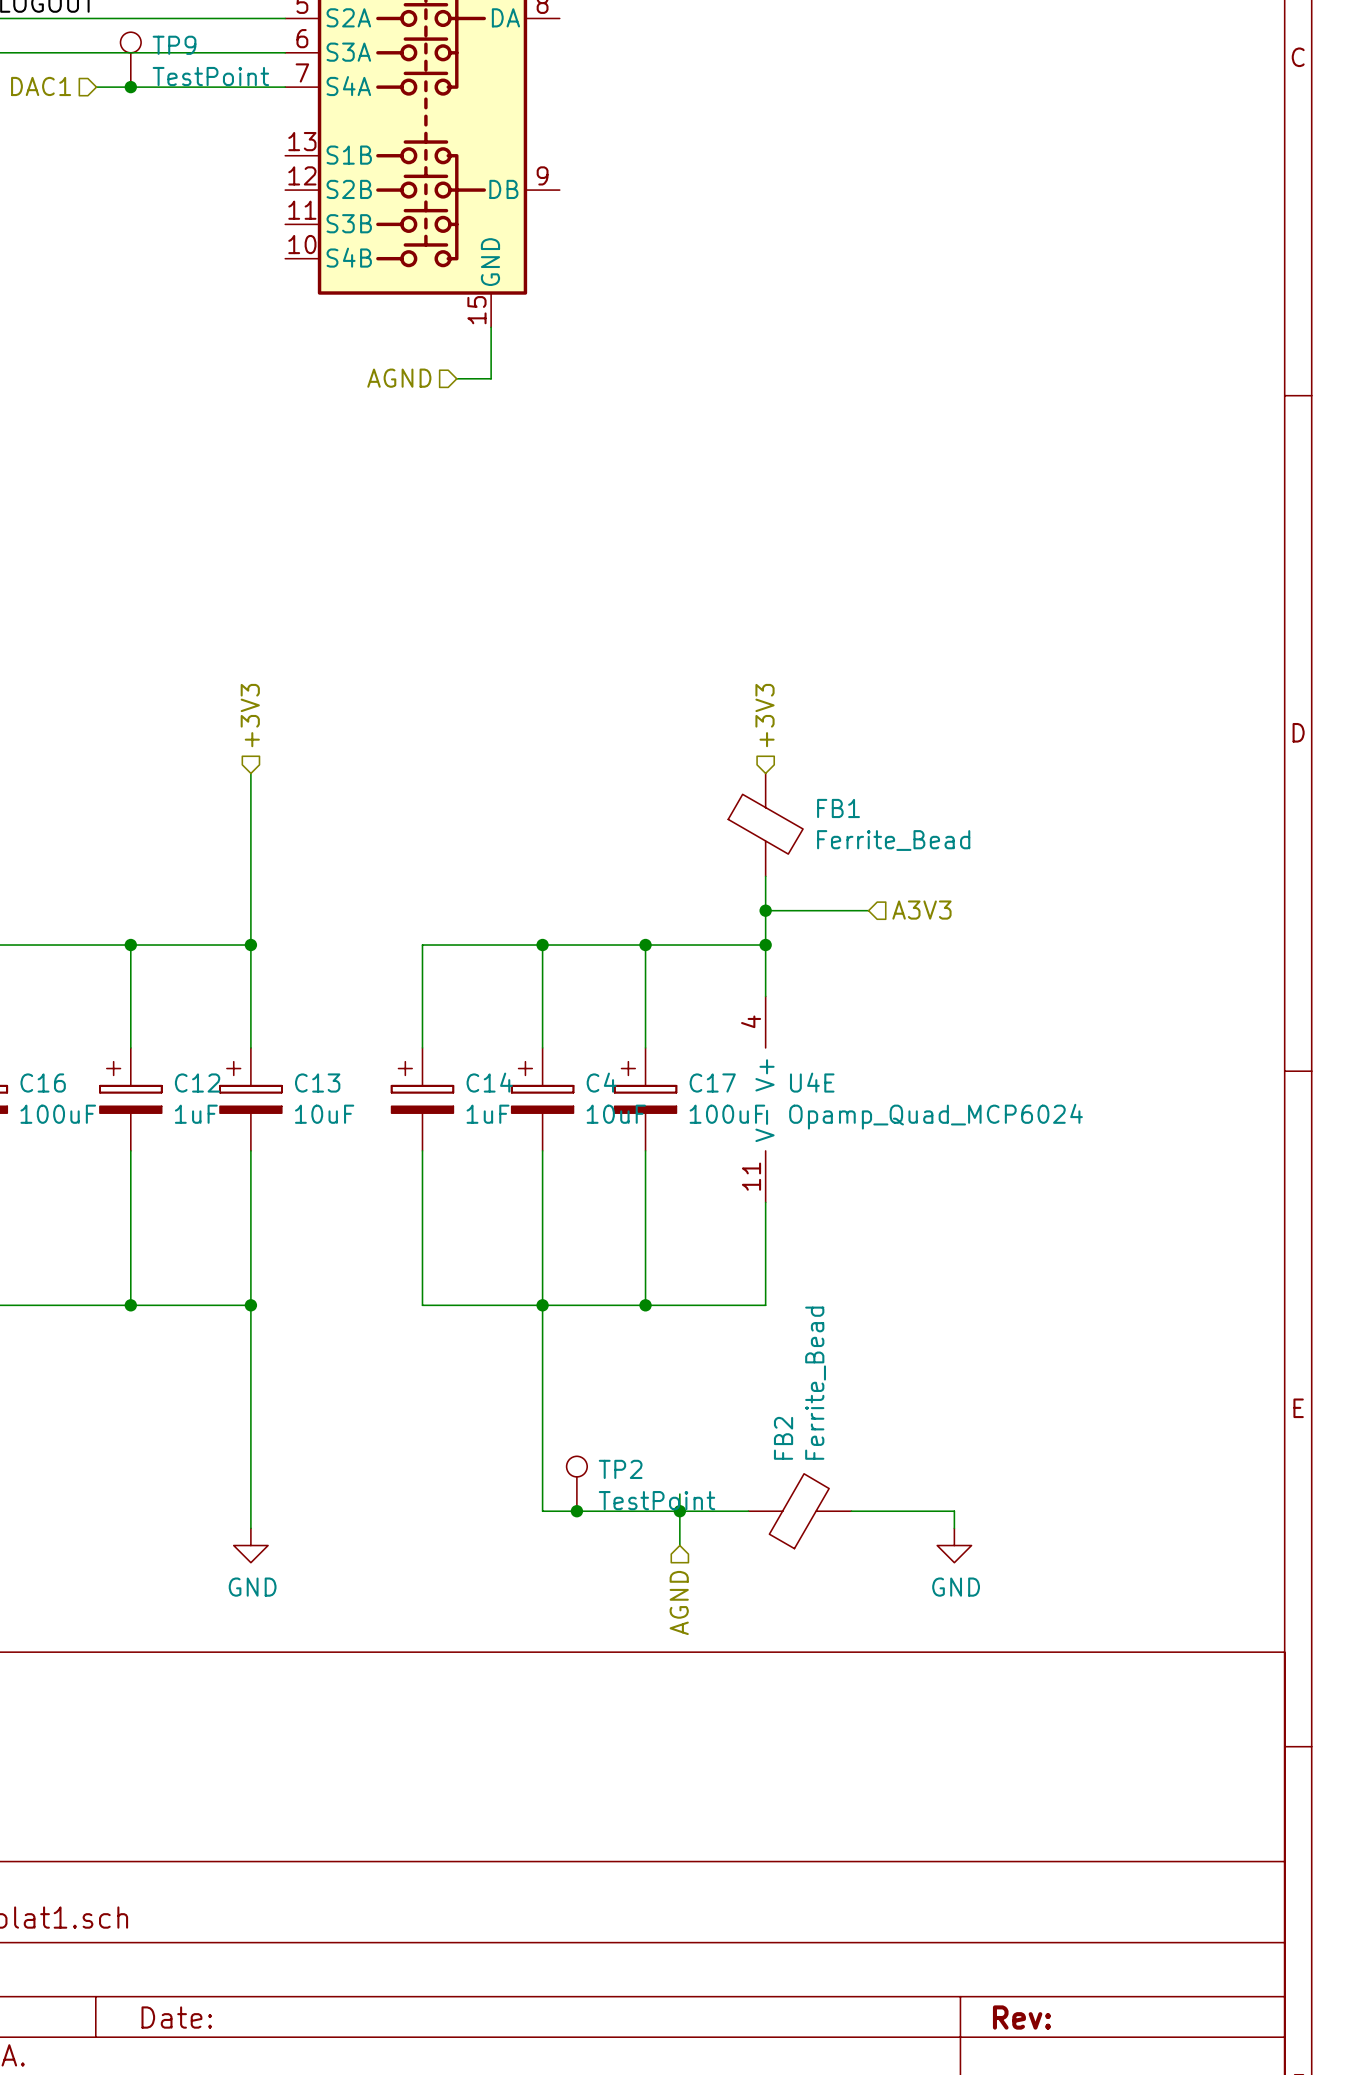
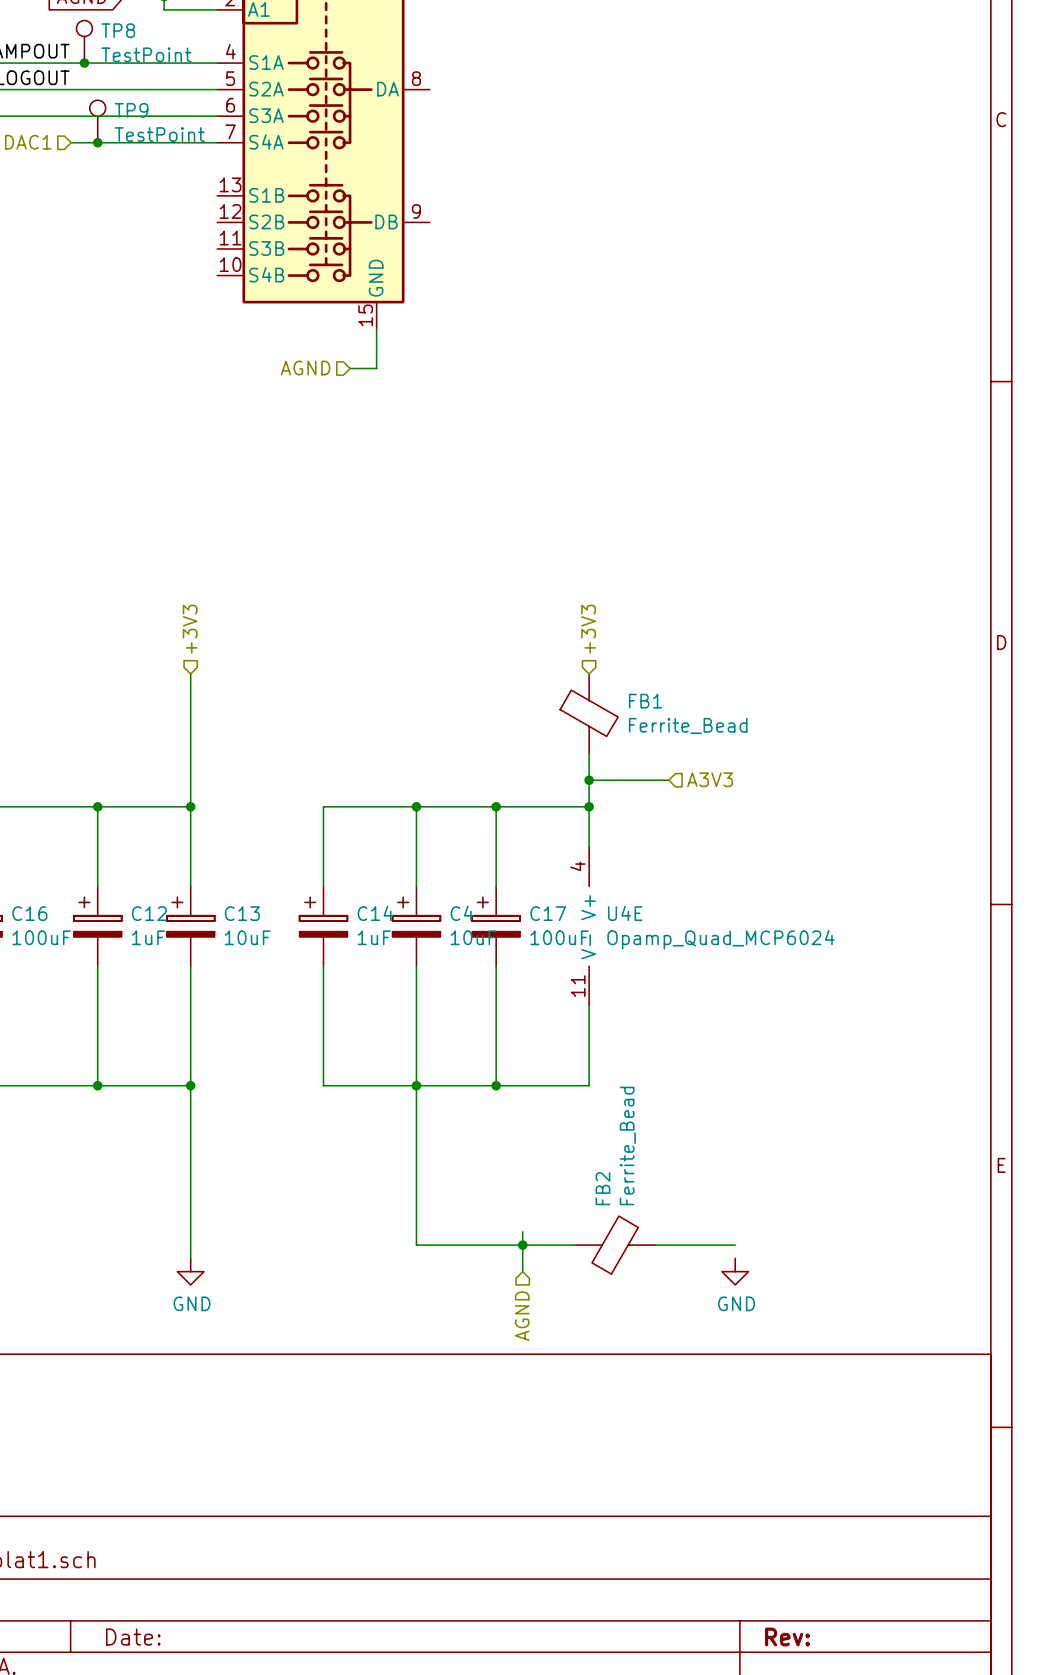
TP2: TestPoint (576, 1483) -> none
junction: (576, 1511) -> none
wire: (954, 1511) (954, 1528) -> none

